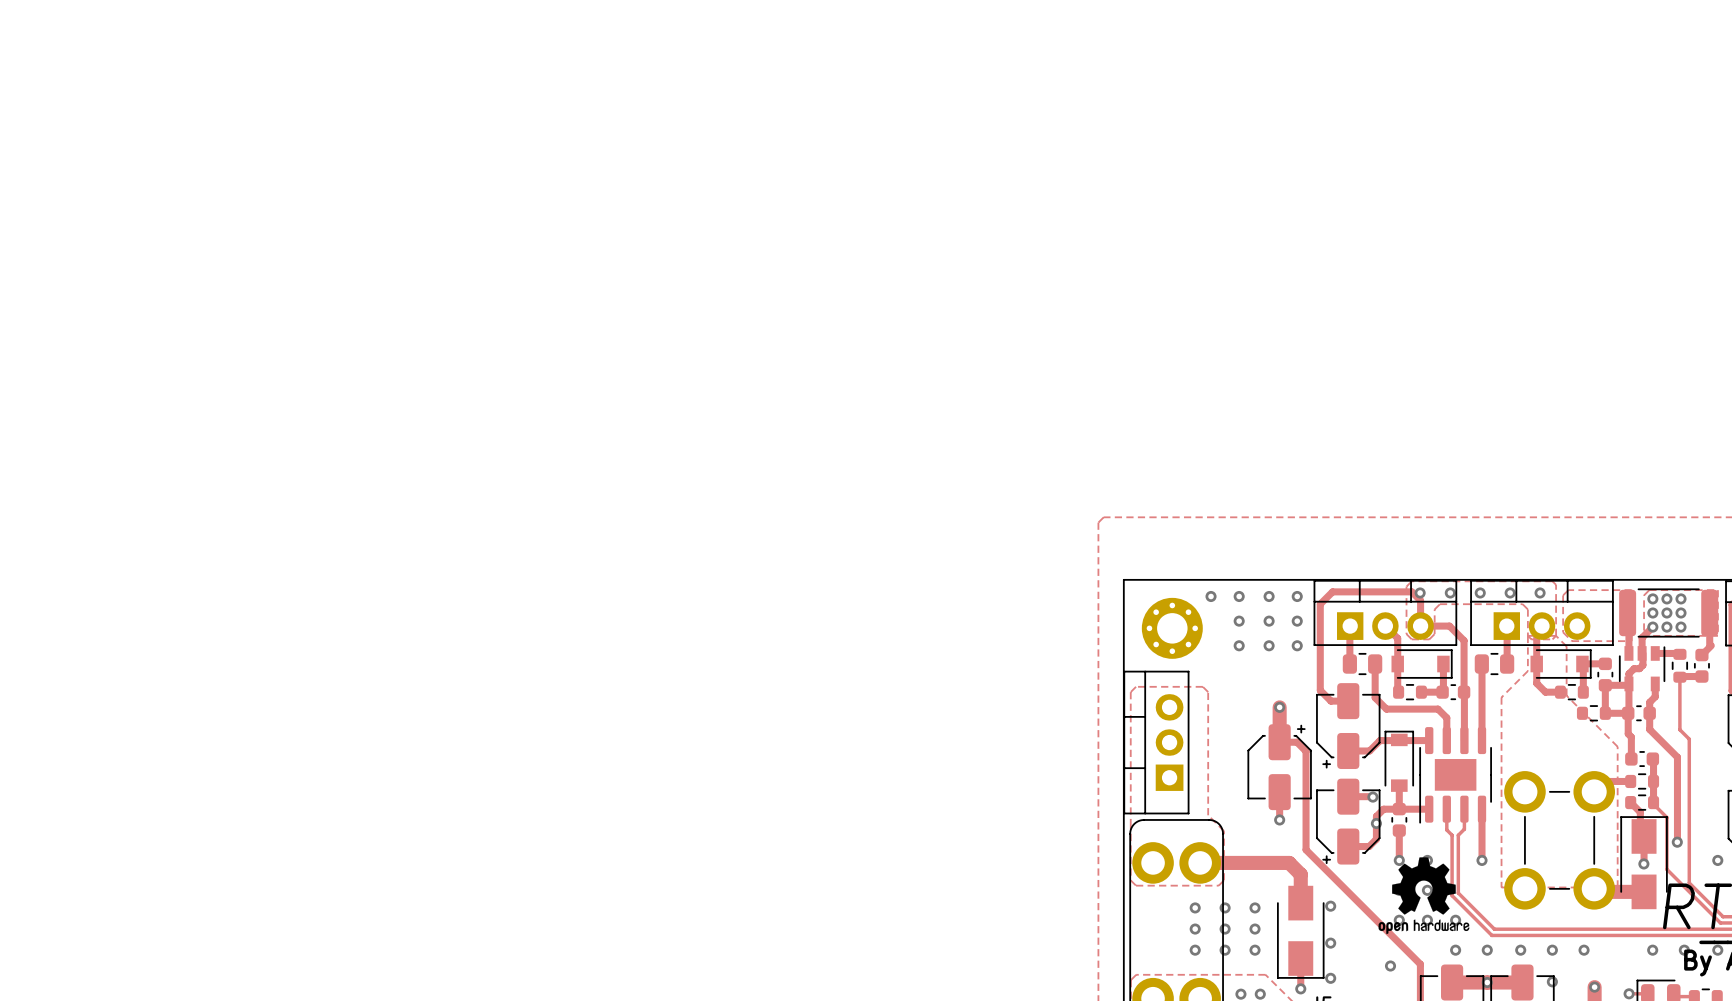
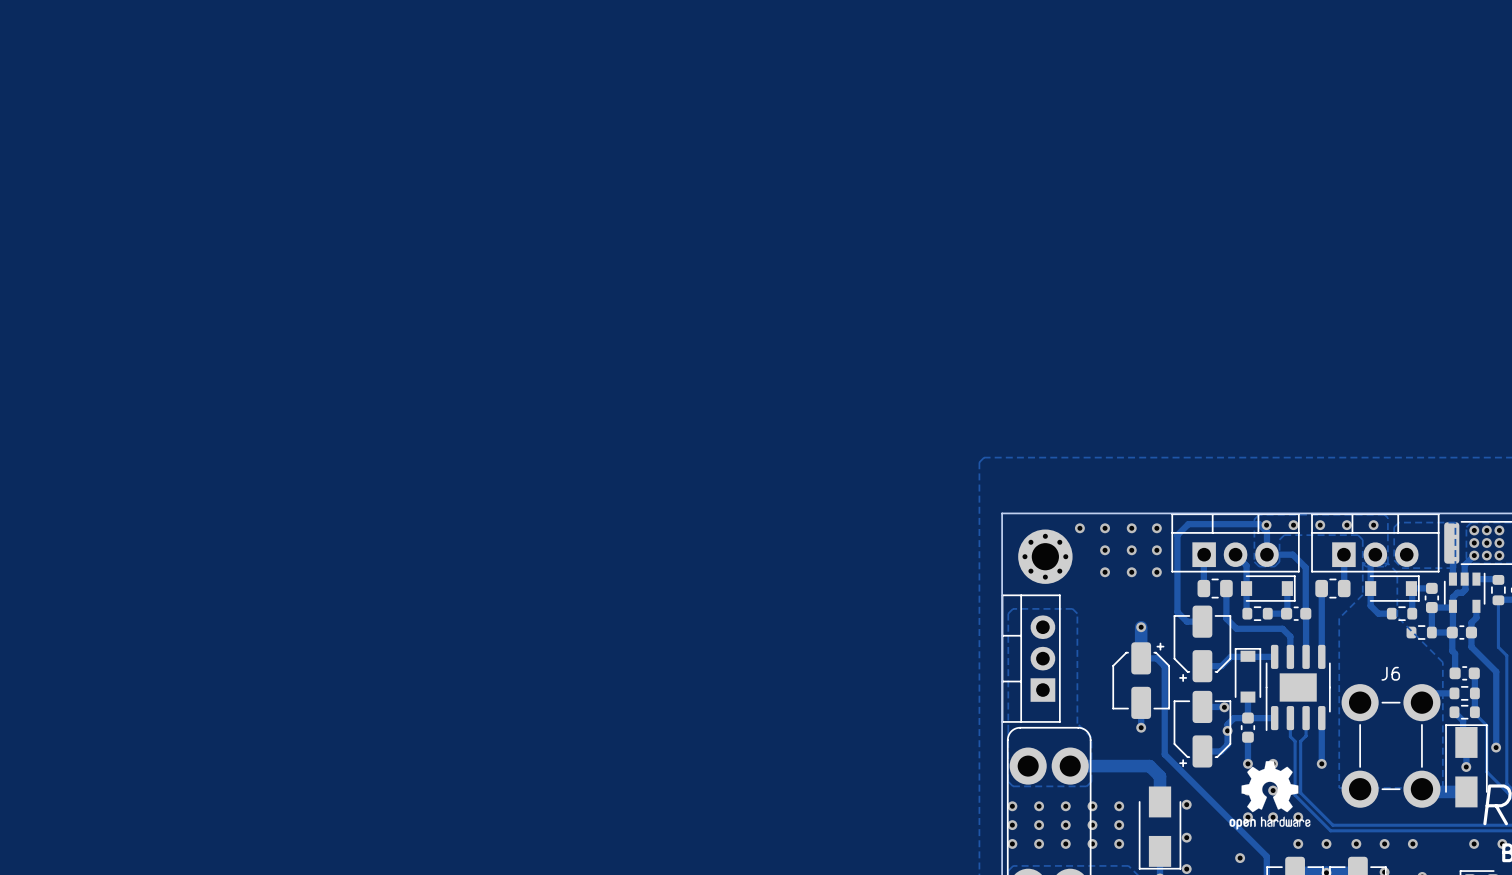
J6 name: none -> J6 (1390, 673)
via: none -> (1012, 806)
via: none -> (1039, 806)
via: none -> (1012, 825)
via: none -> (1039, 825)
via: none -> (1012, 843)
via: none -> (1039, 843)

